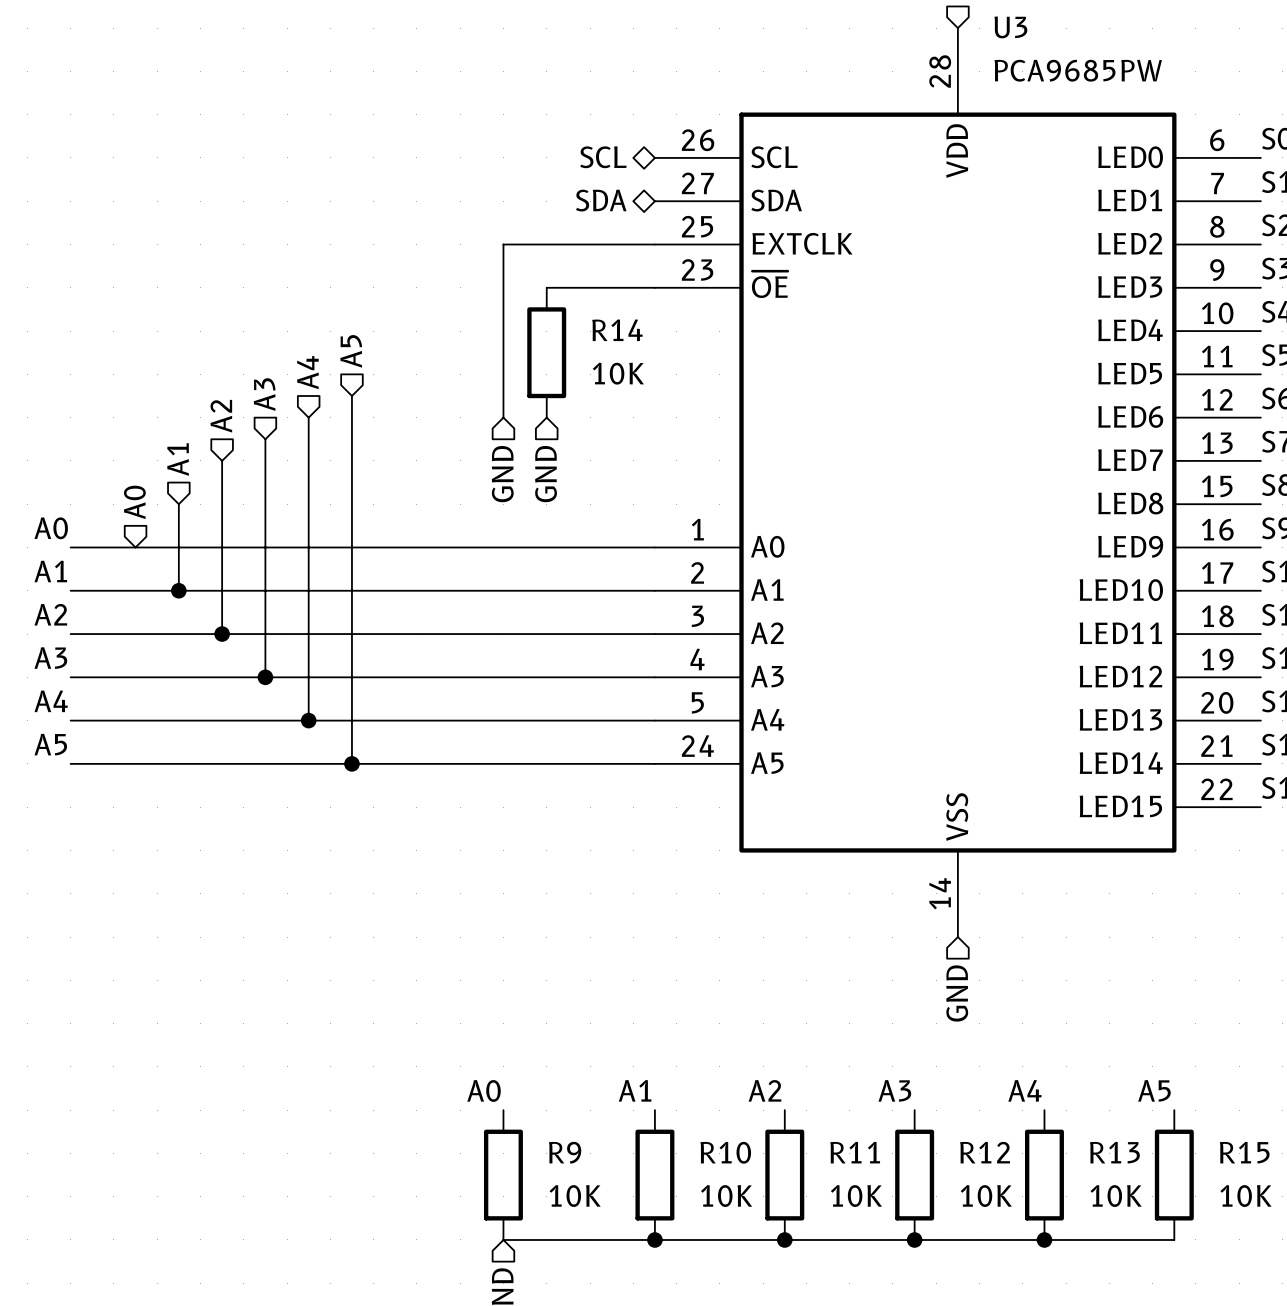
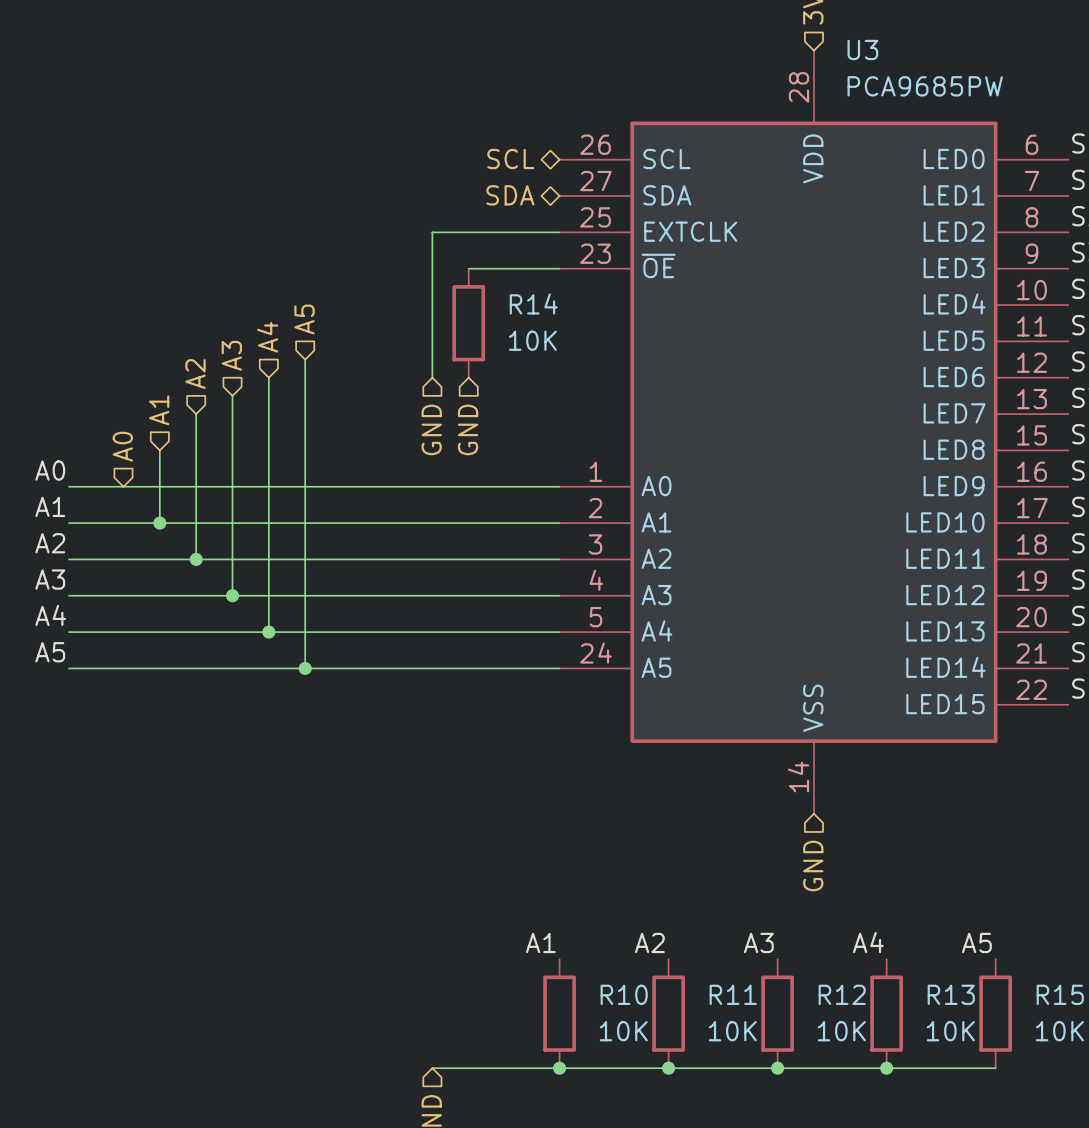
label: A0 (484, 1090) -> none
R9: 10K (503, 1175) -> none

